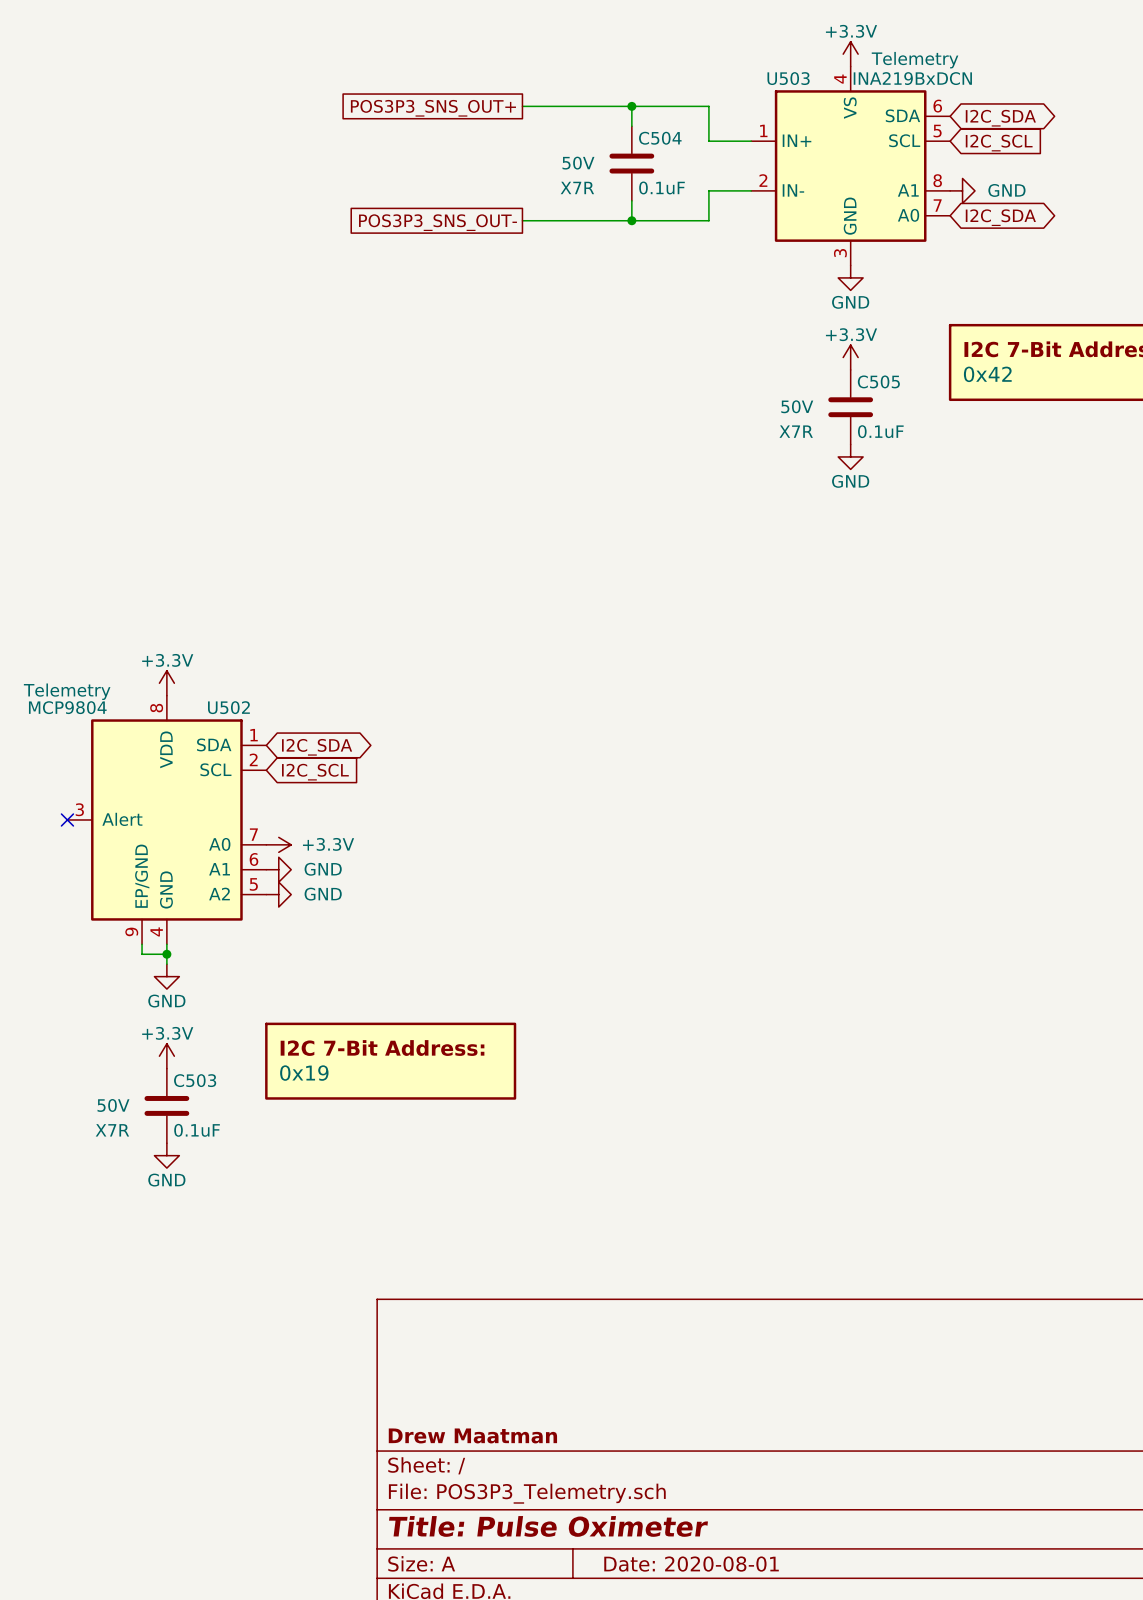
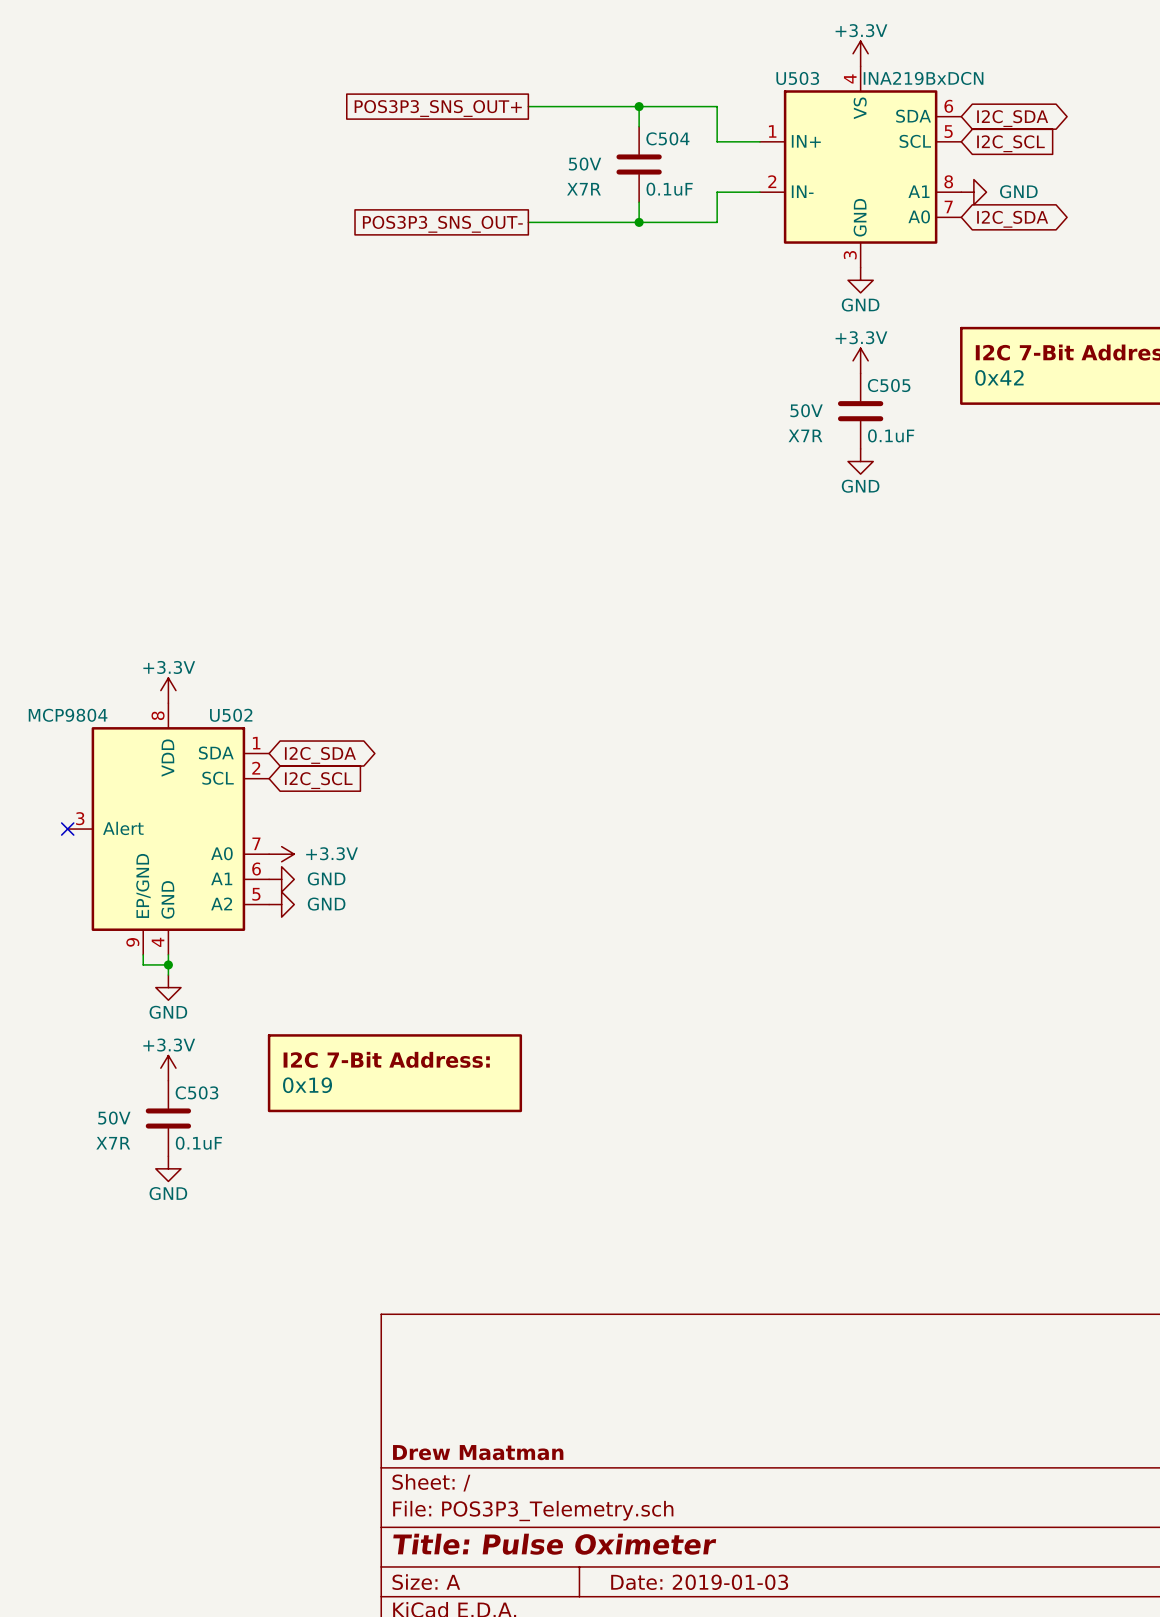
U503 text: Telemetry (915, 60) -> none
U502 text: Telemetry (67, 691) -> none
title block: Date: 2020-08-01 (691, 1564) -> Date: 2019-01-03 (699, 1582)

